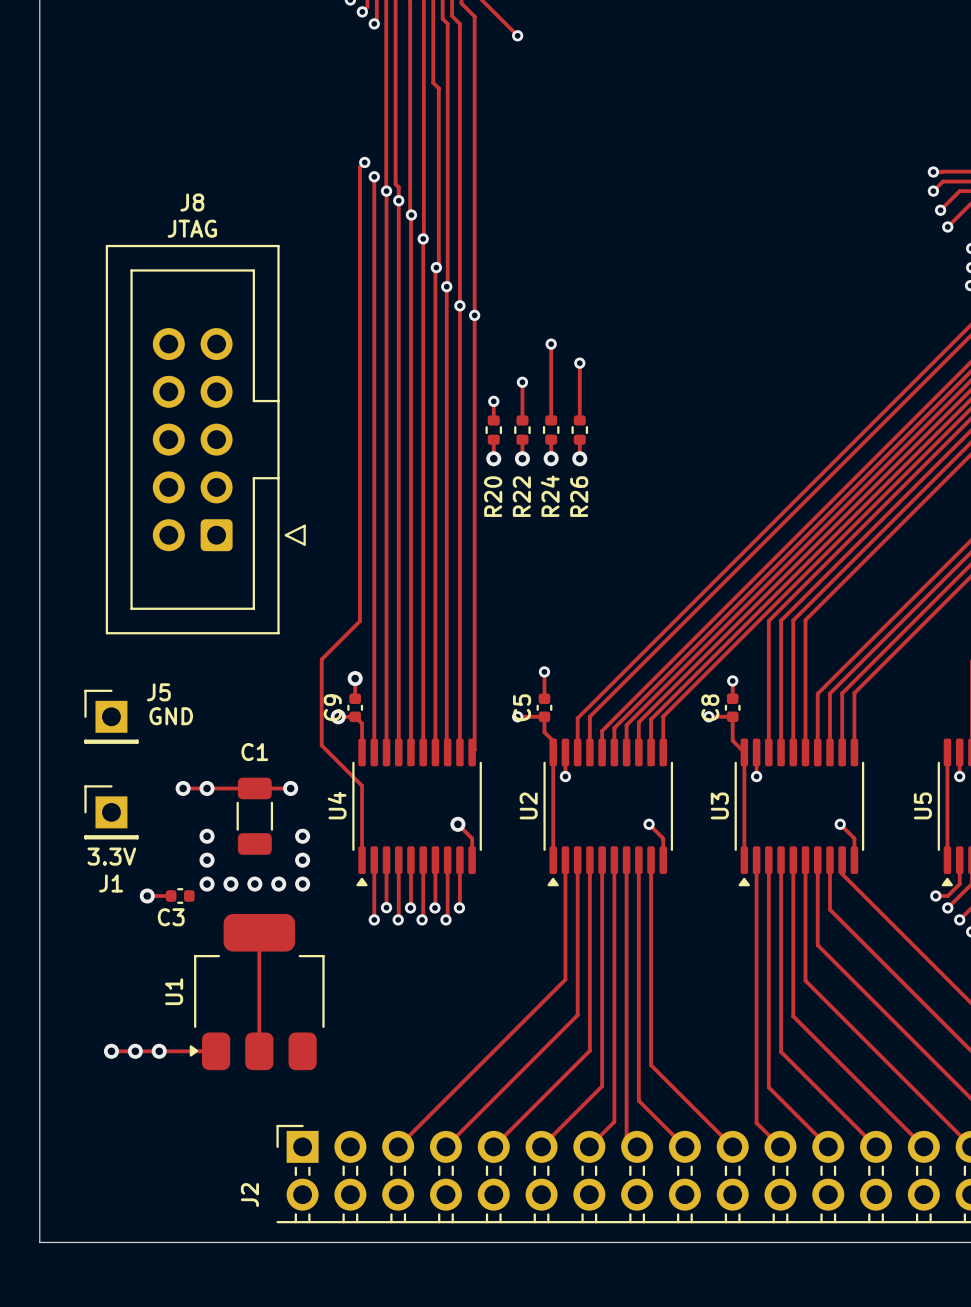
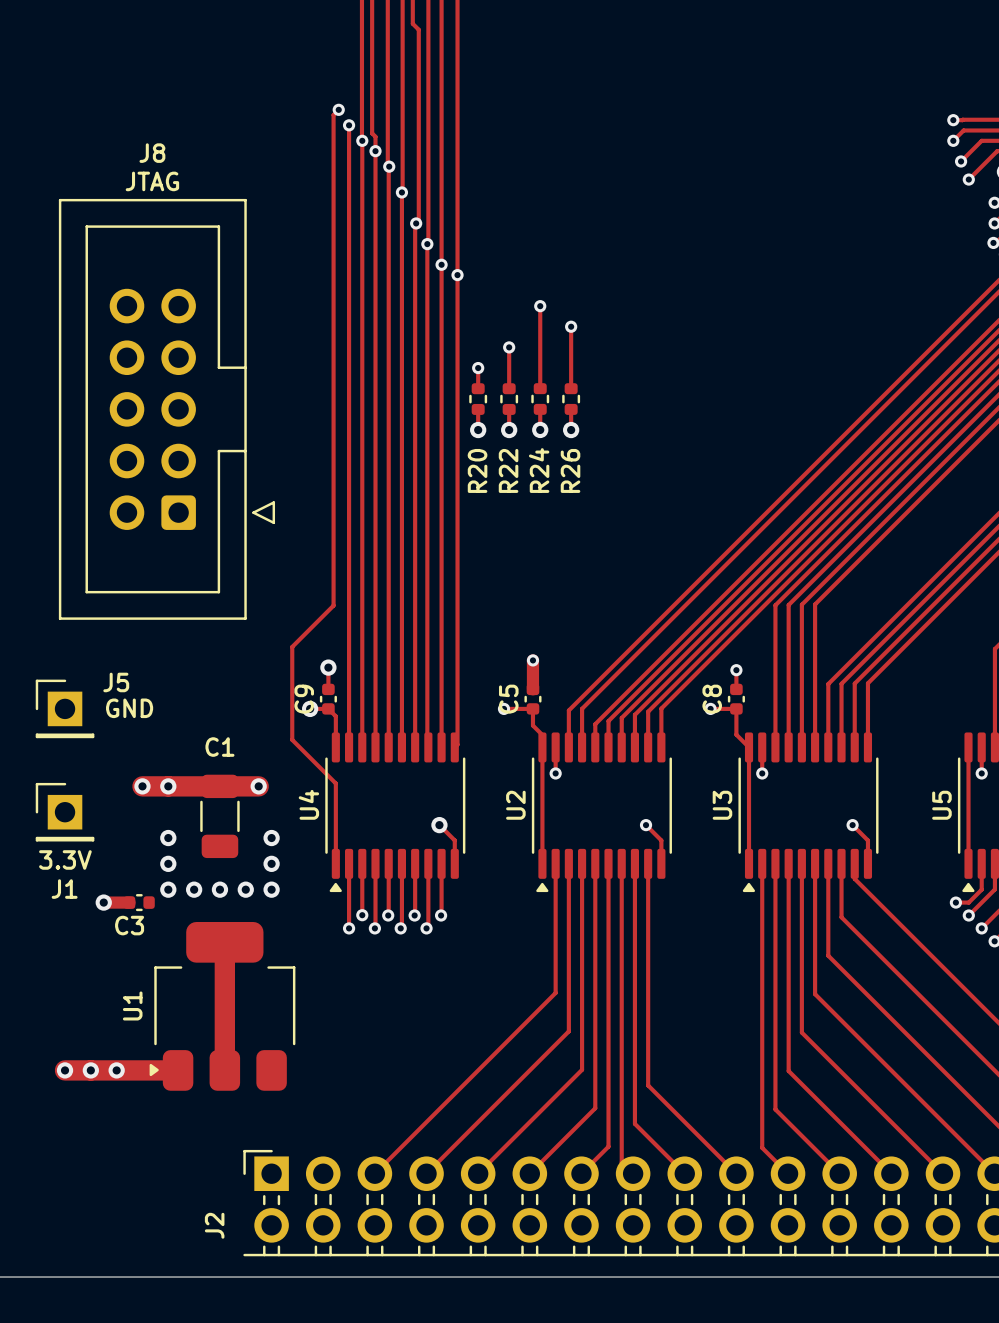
track width: thin (544, 671) (544, 698) -> thick (532, 660) (532, 689)
track width: thin (183, 788) (290, 788) -> thick (142, 786) (258, 786)
track width: thin (147, 896) (171, 896) -> thick (103, 902) (129, 902)
track width: thin (259, 932) (259, 1051) -> thick (224, 942) (224, 1070)
track width: thin (111, 1051) (216, 1051) -> thick (65, 1070) (178, 1070)

